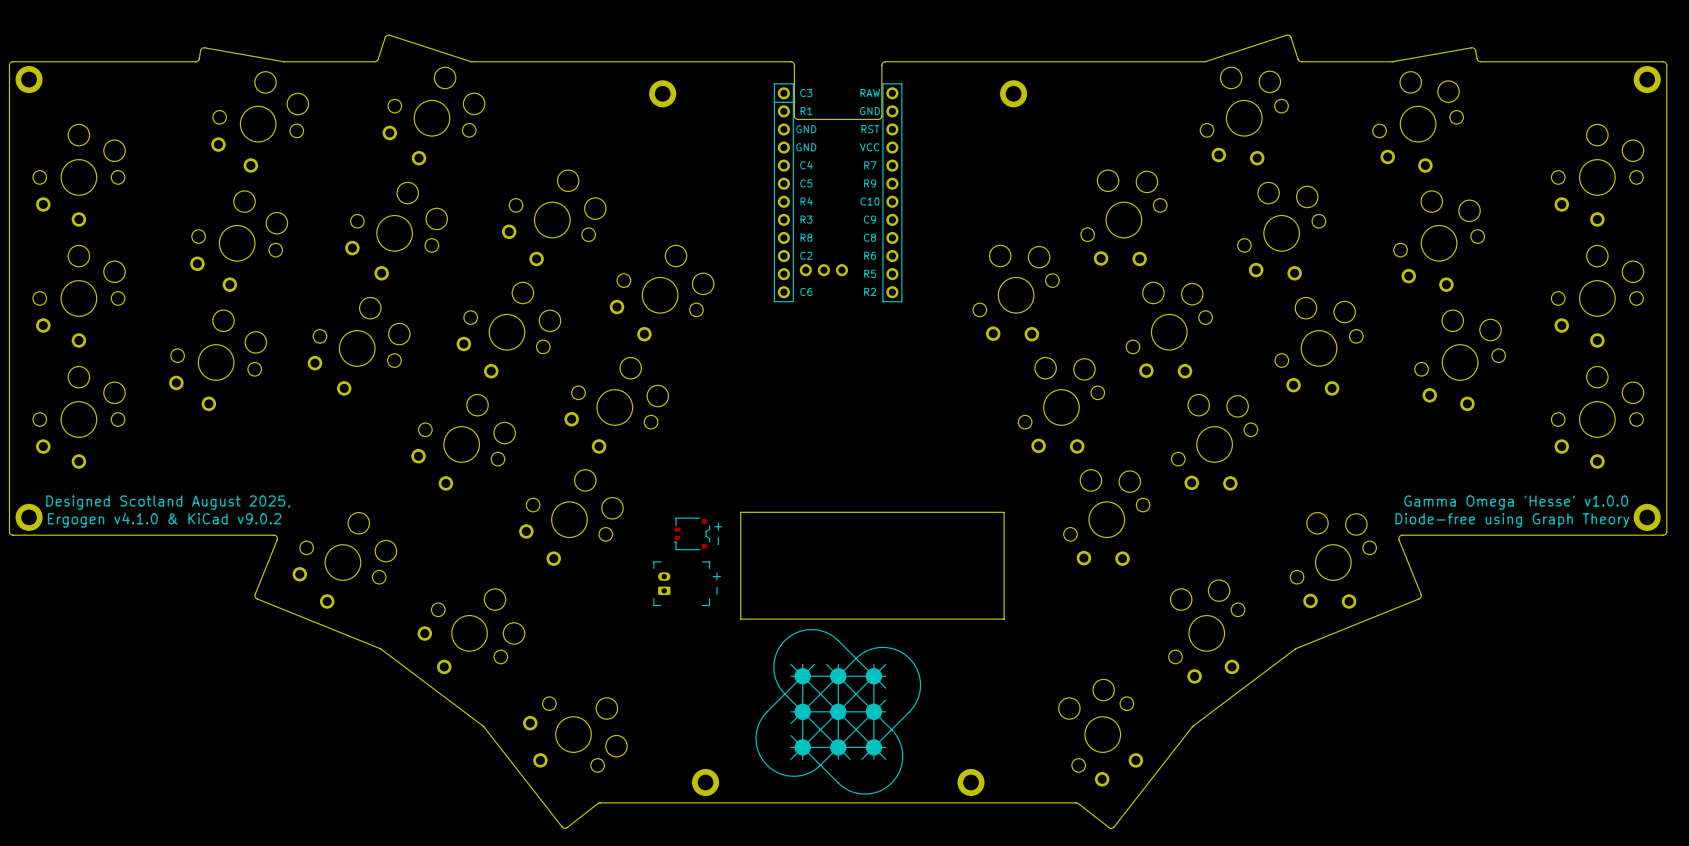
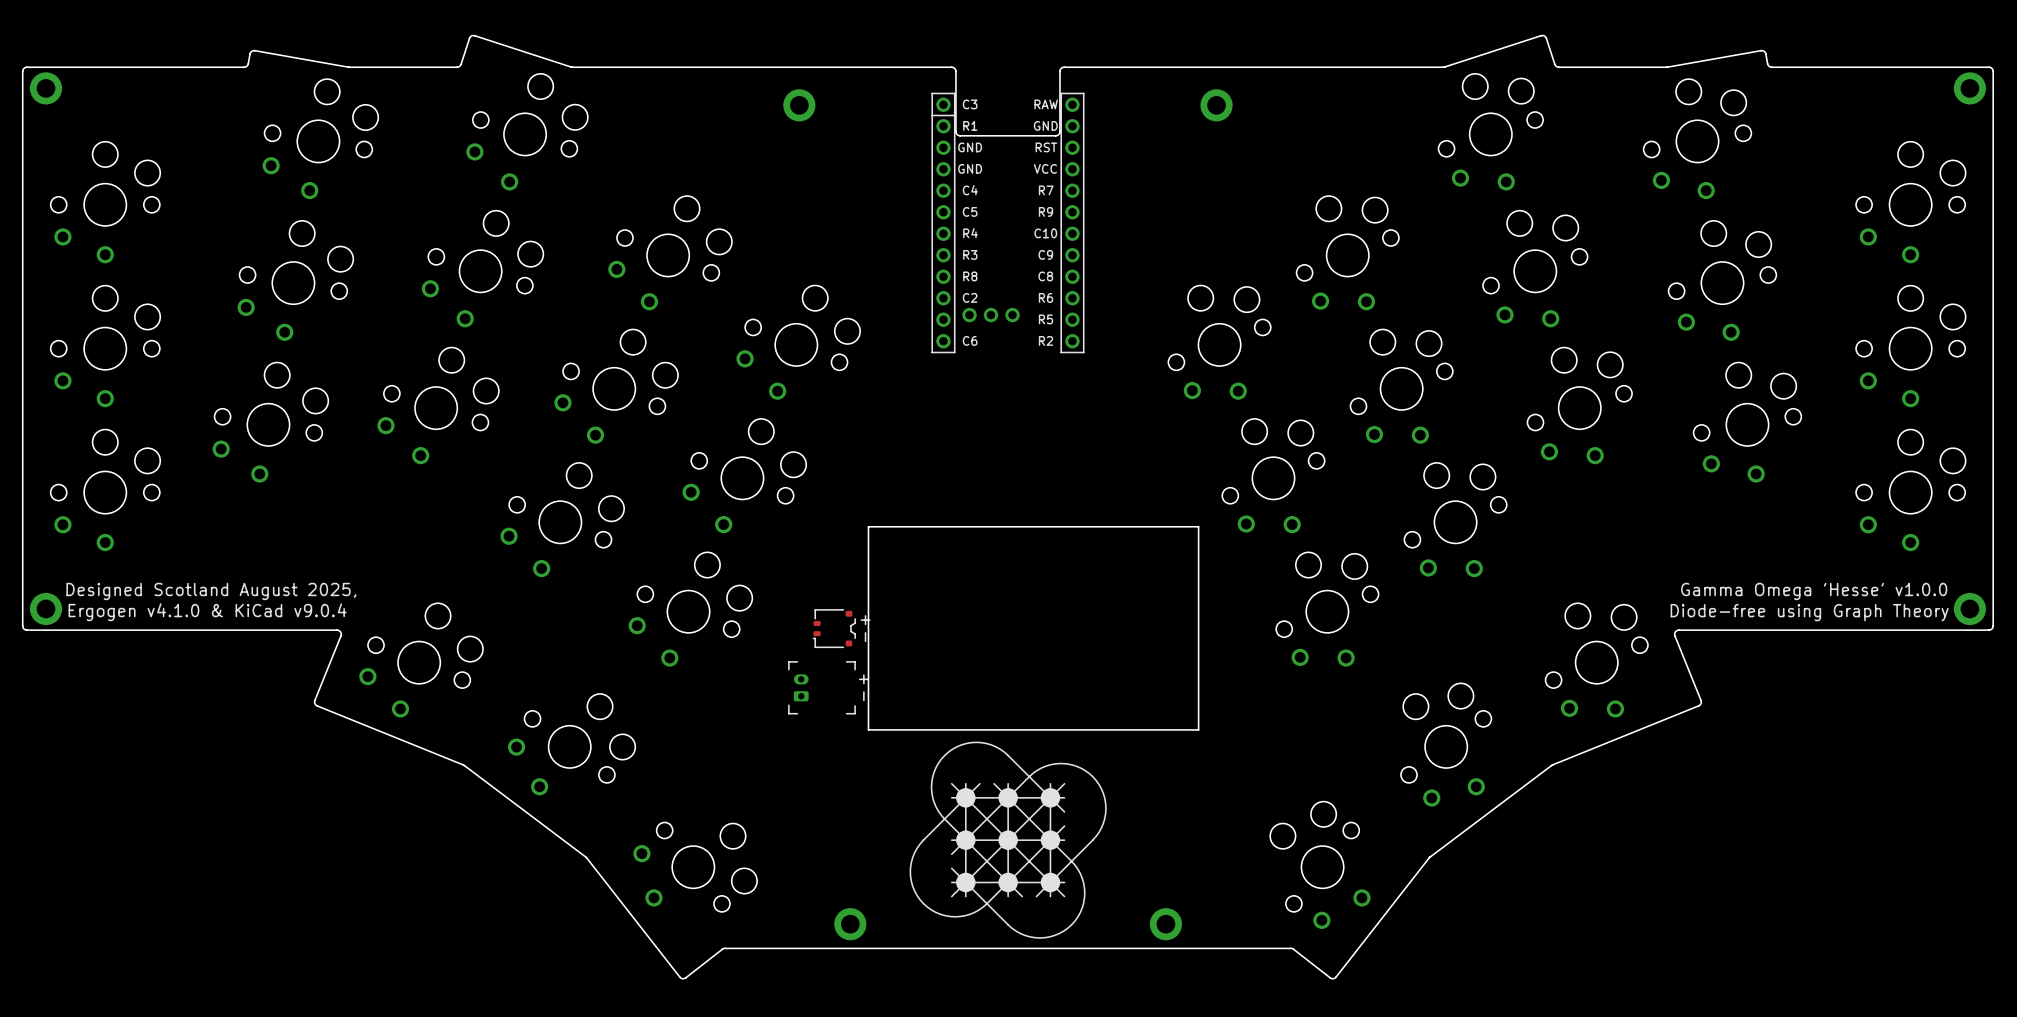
text: Ergogen v4.1.0 & KiCad v9.0.2 (164, 520) -> Ergogen v4.1.0 & KiCad v9.0.4 (207, 612)
board edge: (740, 619) (740, 512) (1004, 512) (1004, 619) (998, 619) -> (892, 729) (868, 729) (868, 526) (1198, 526) (1198, 729)

